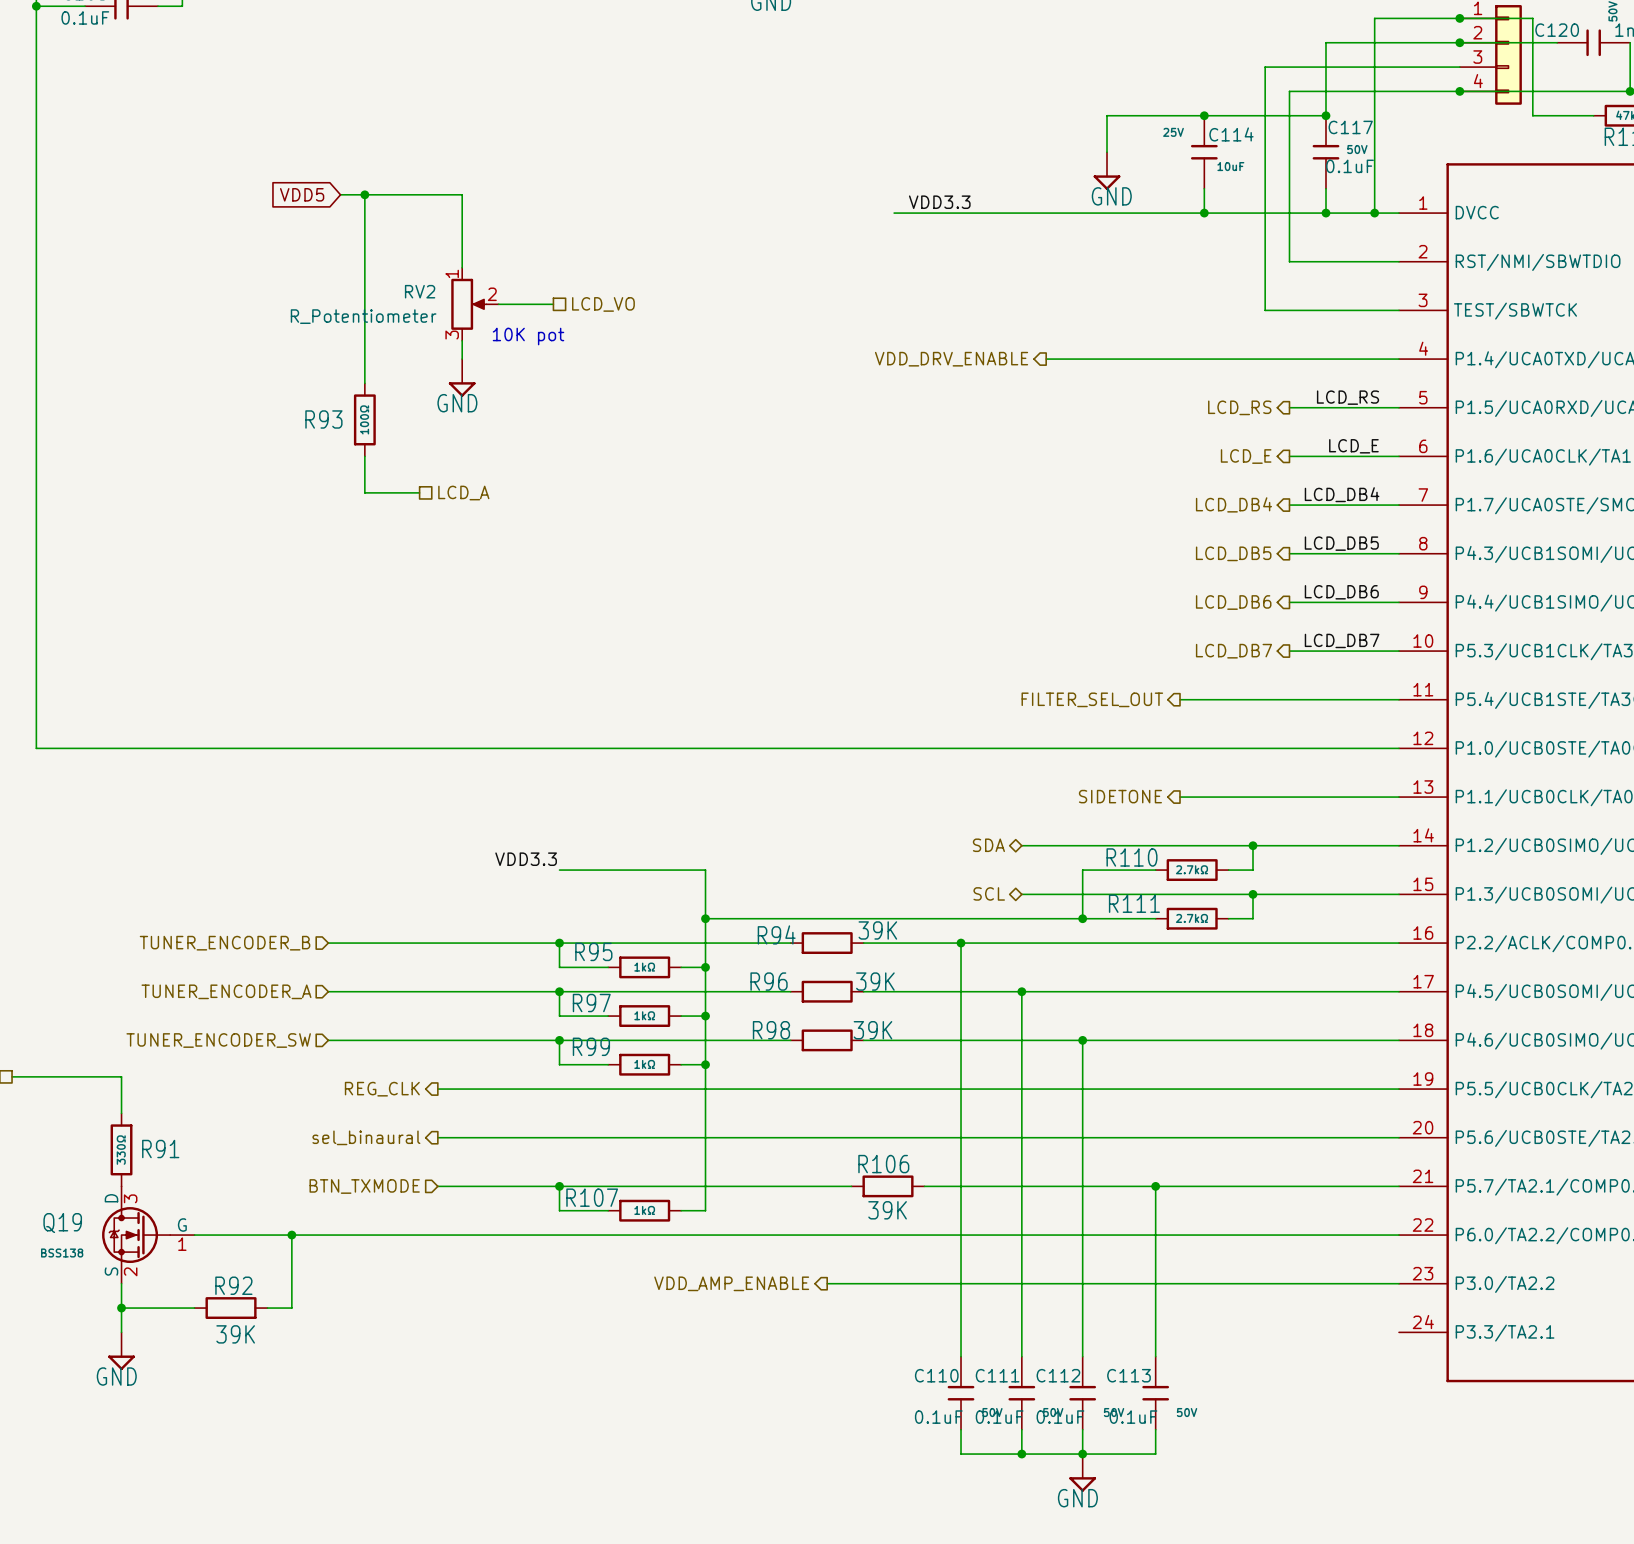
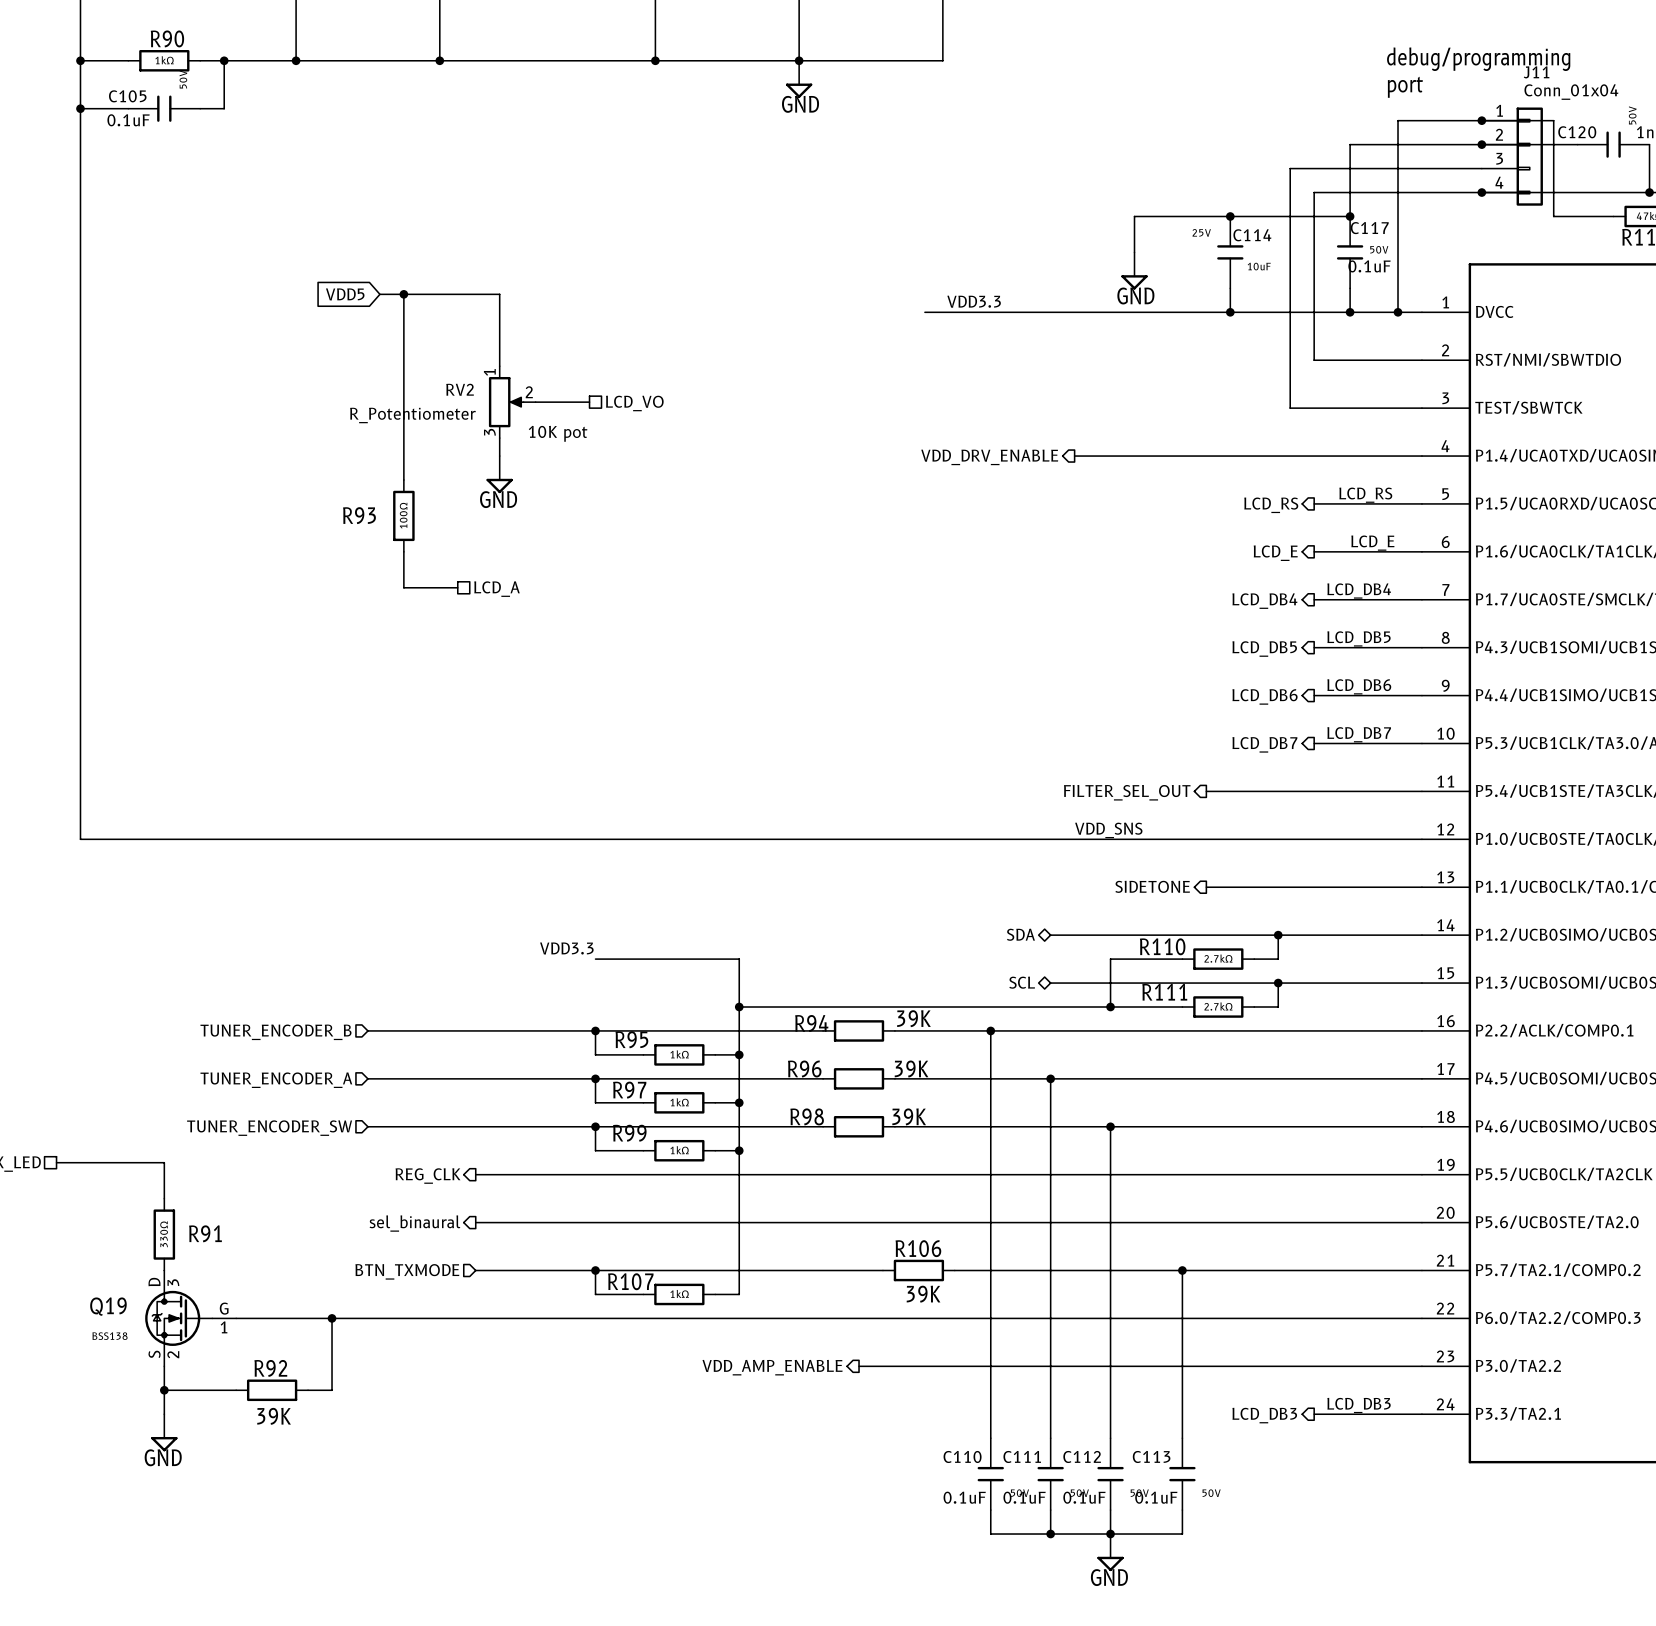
label: none -> VDD_SNS (1108, 830)
label: none -> LCD_DB3 (1359, 1405)
hierarchical label: none -> LCD_DB3 (1264, 1415)
wire: none -> (1314, 1414) (1421, 1414)

